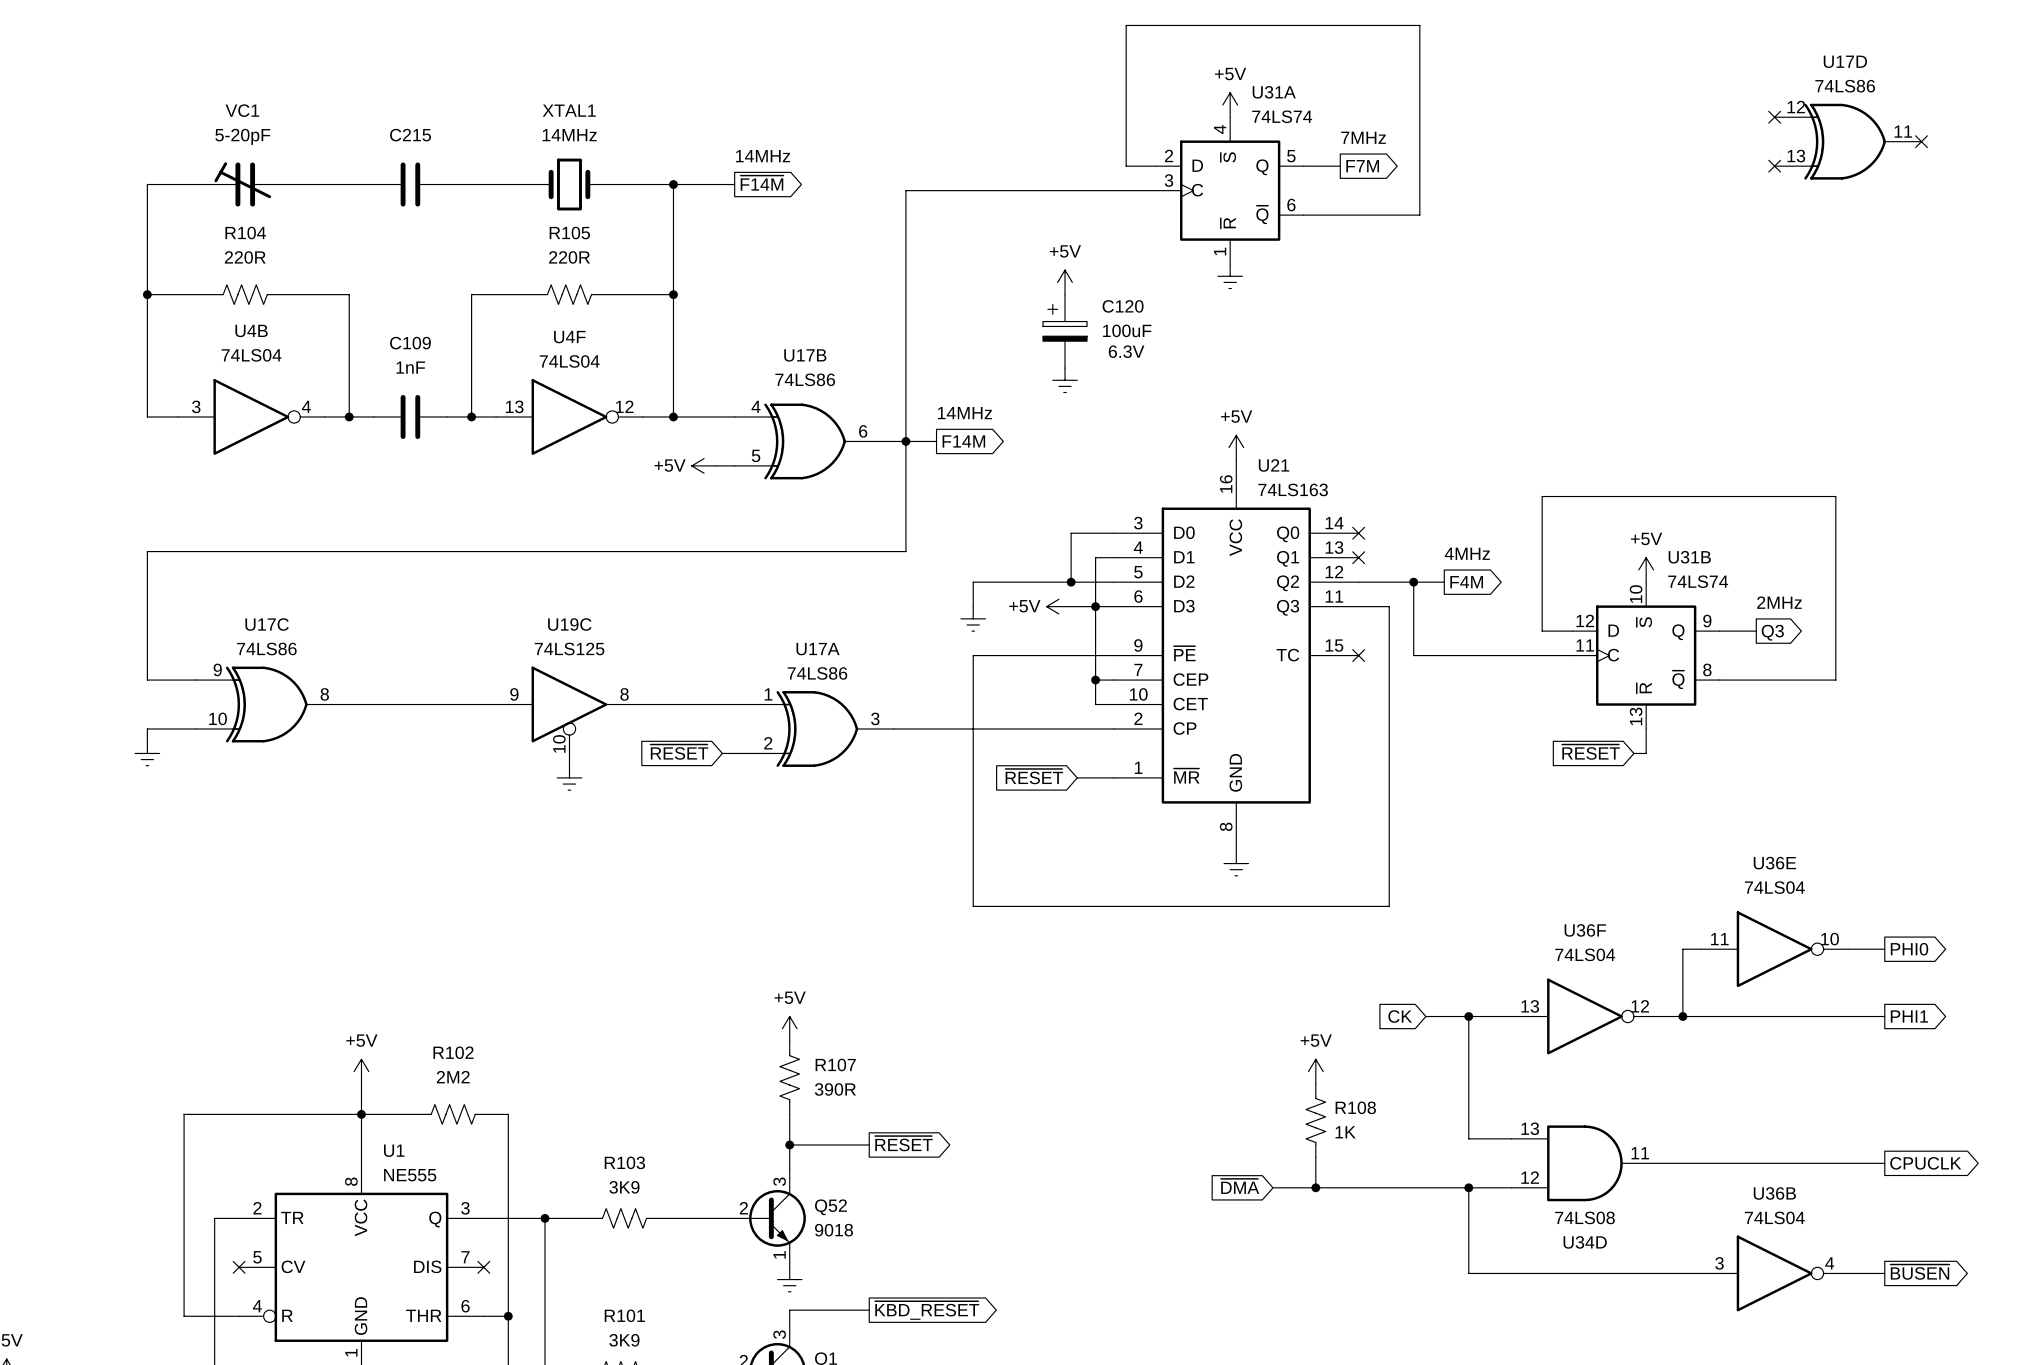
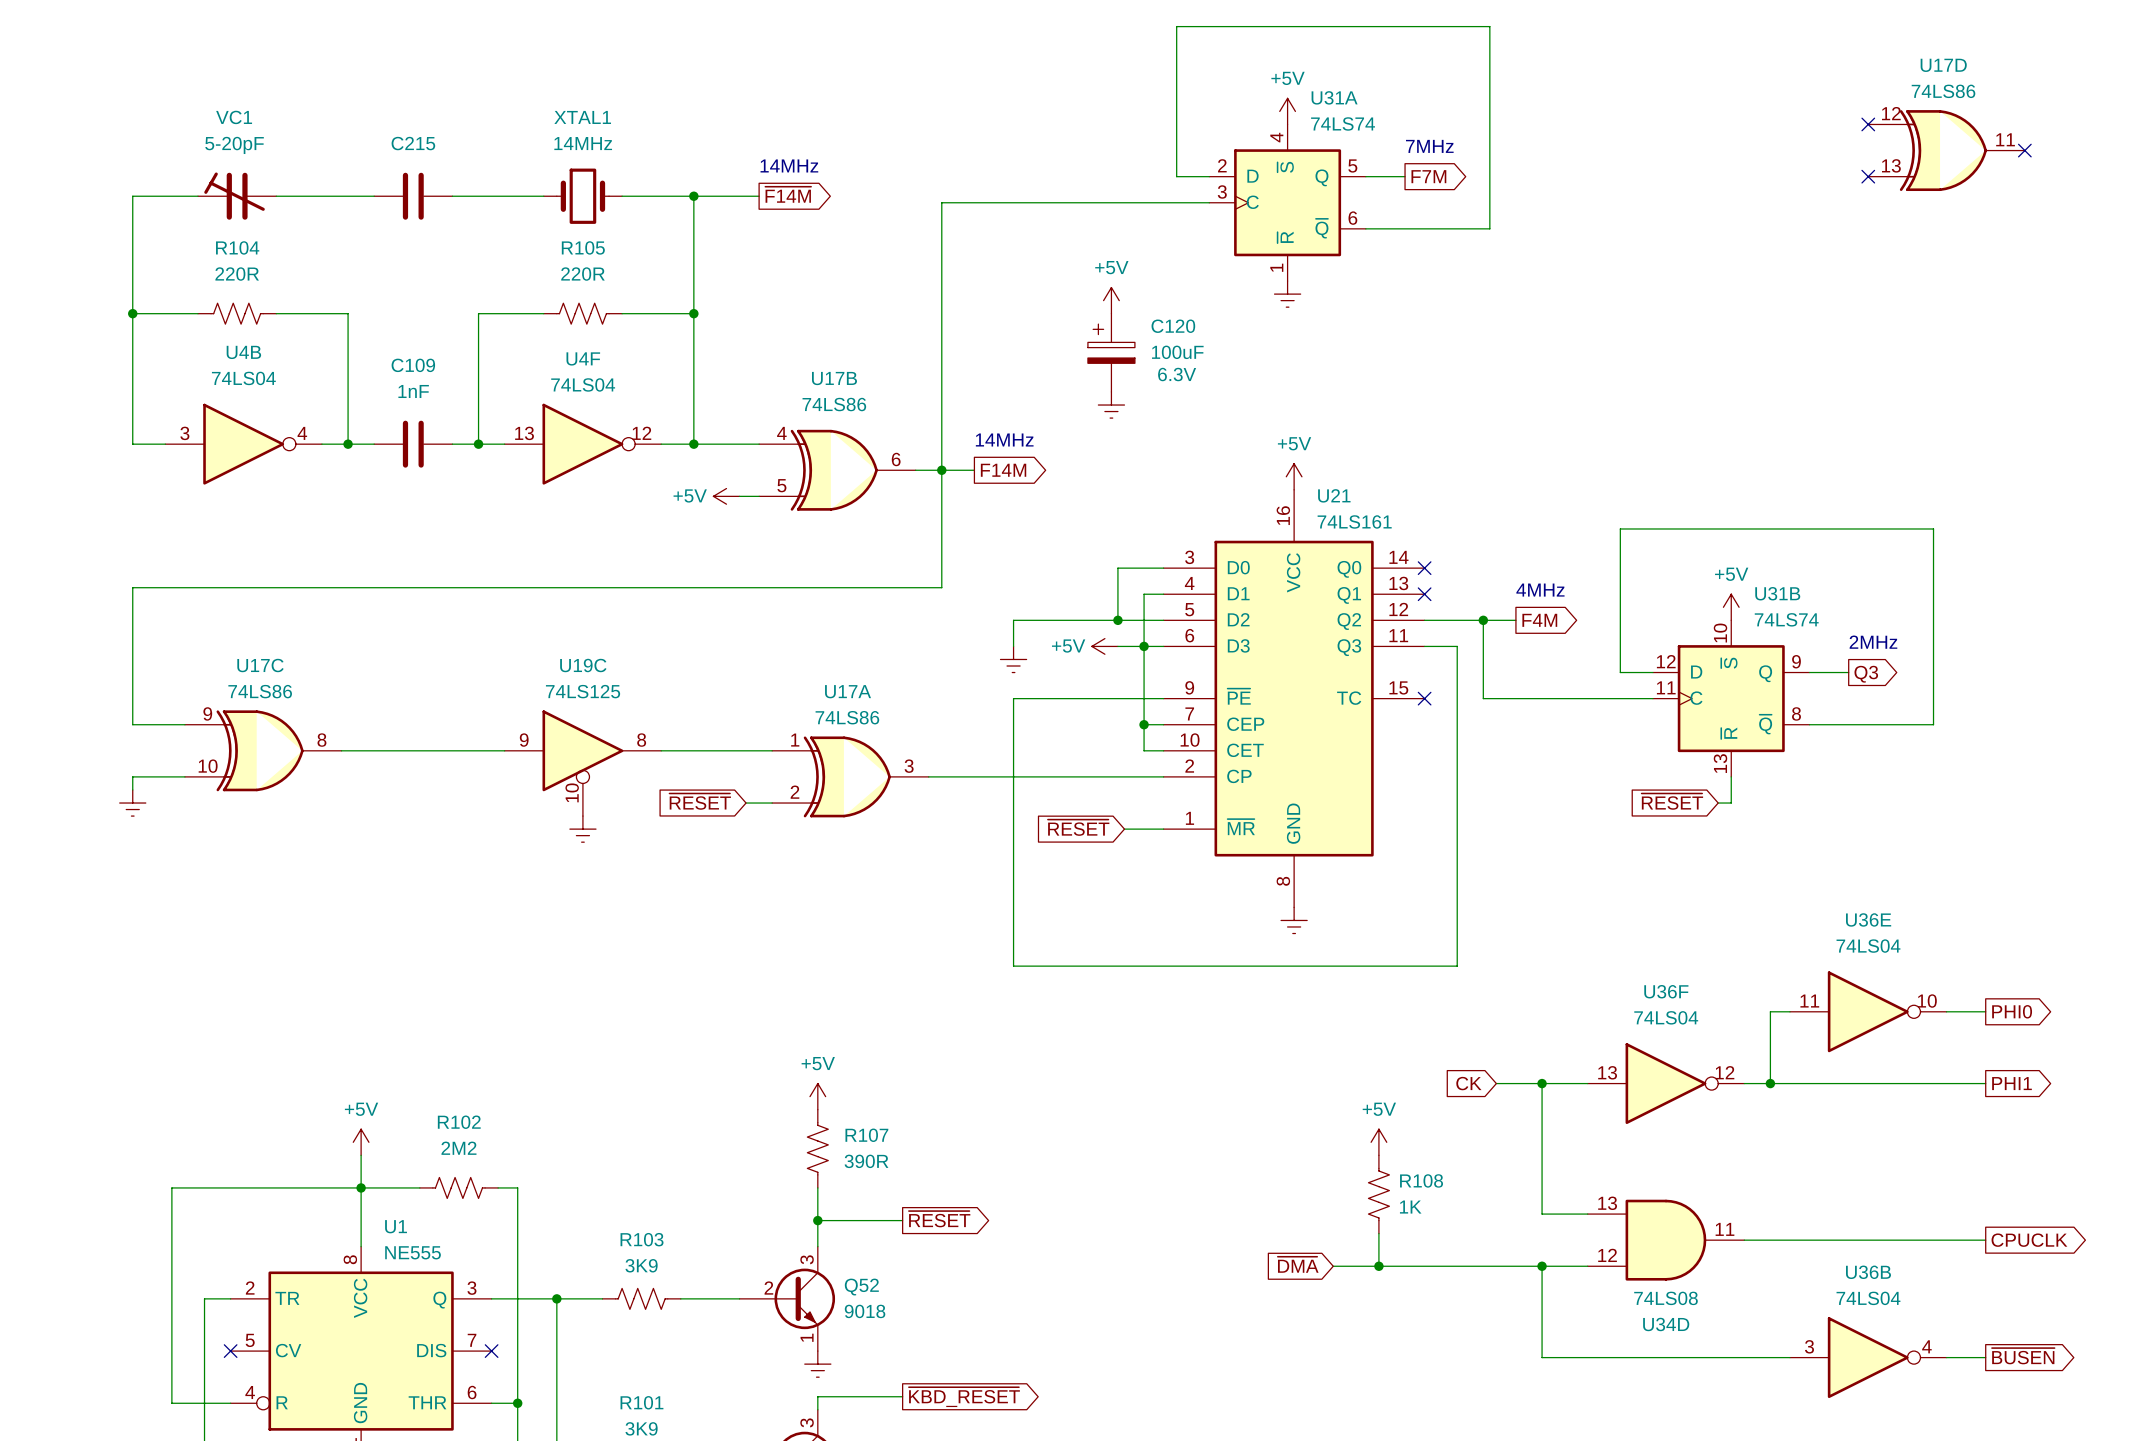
U21 value: 74LS163 (1293, 489) -> 74LS161 (1354, 521)

